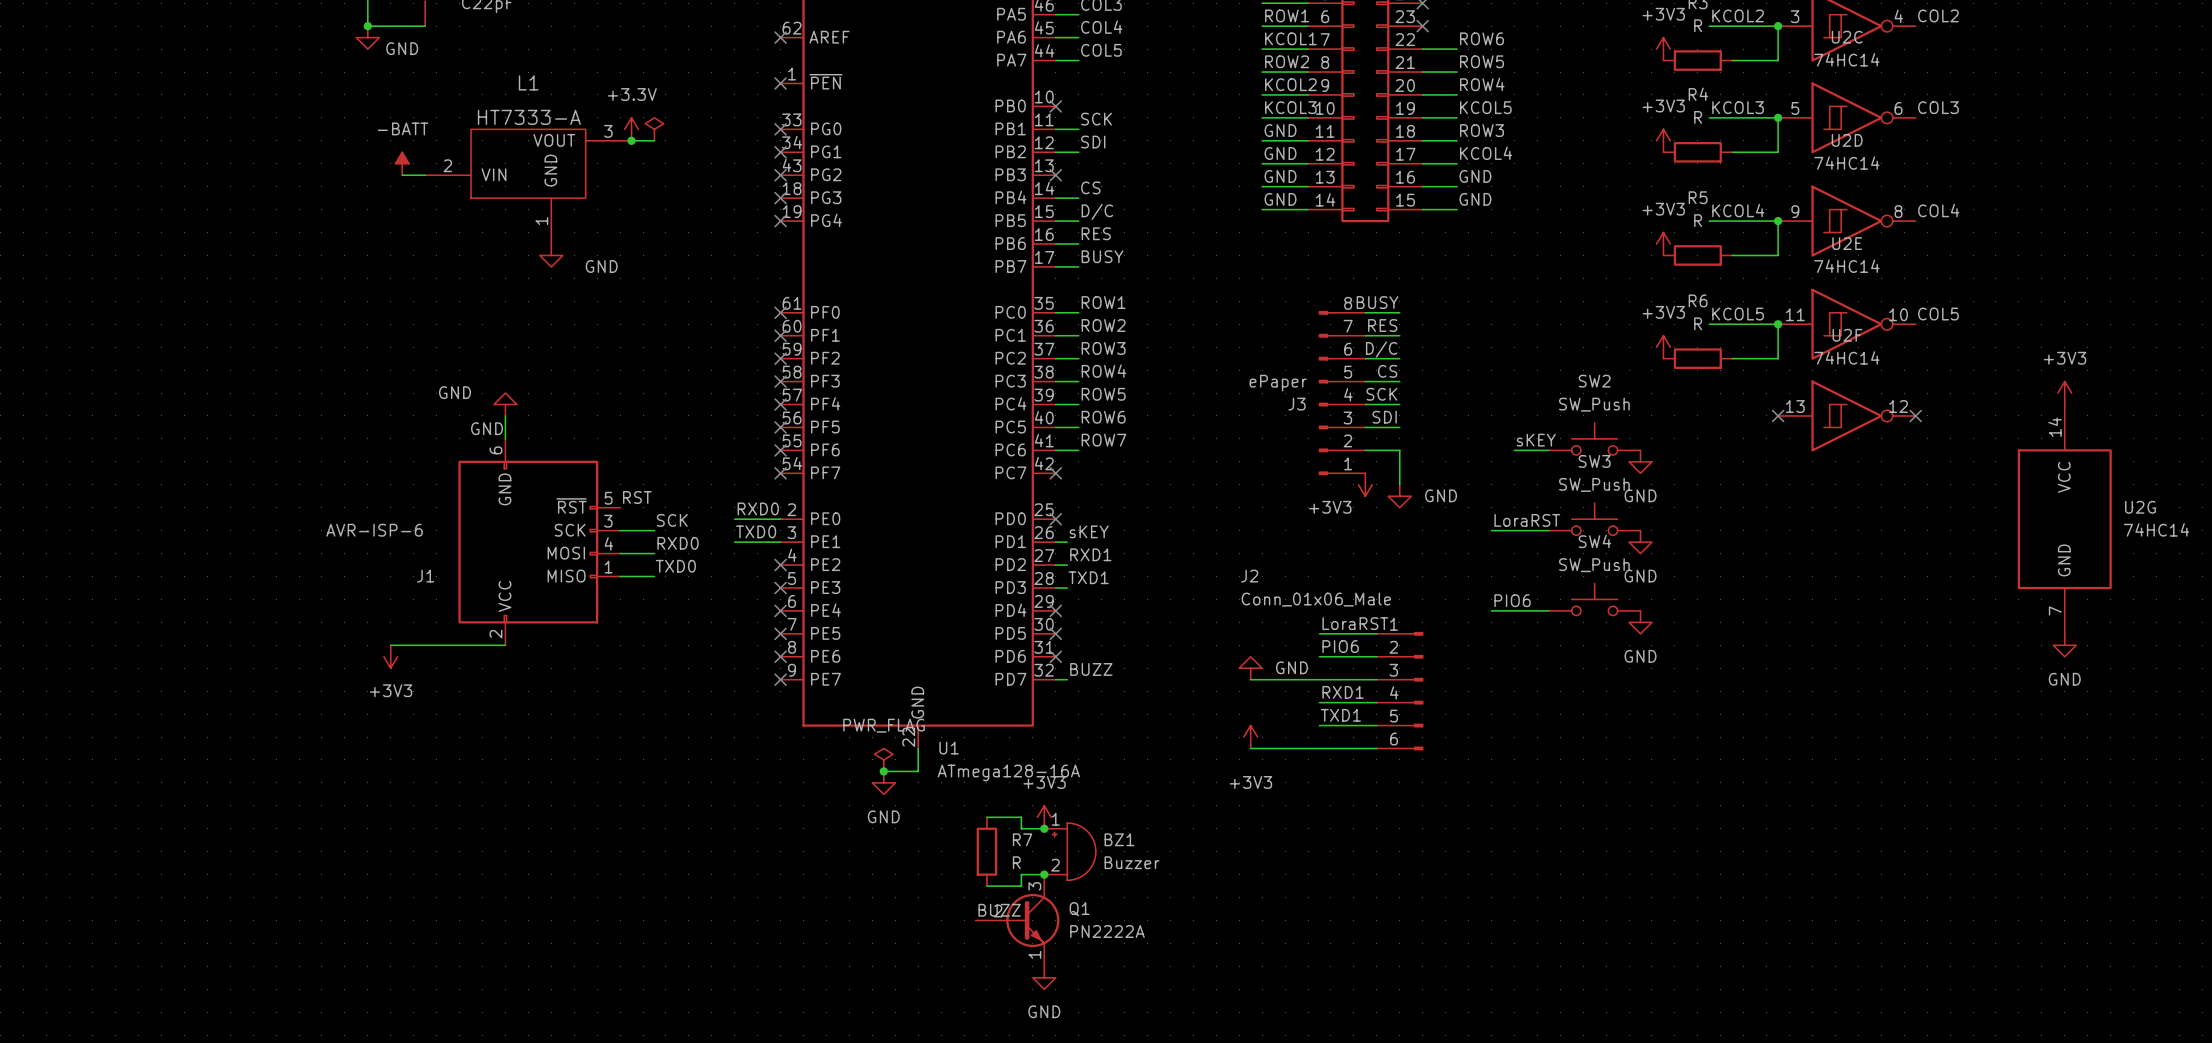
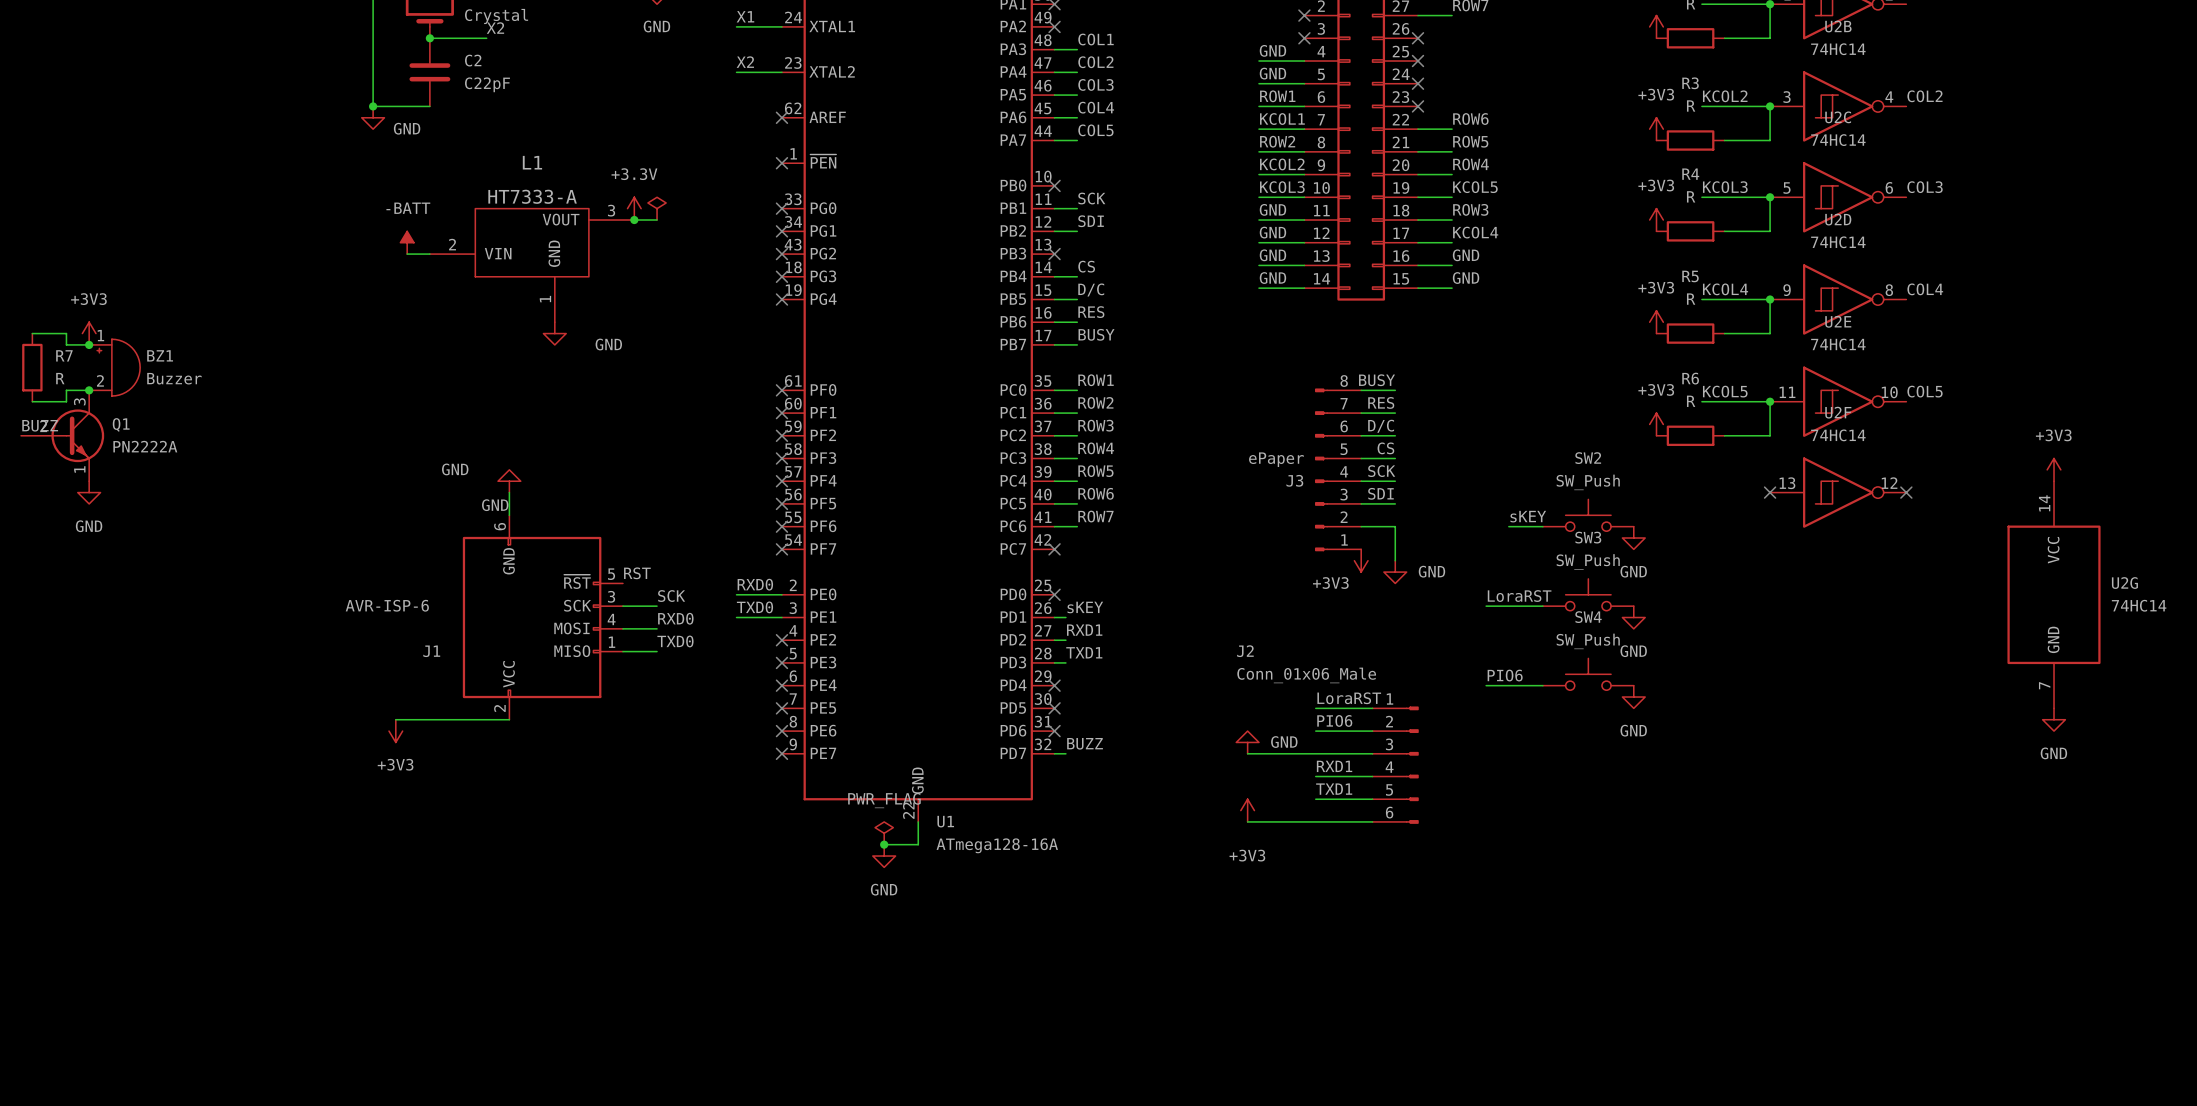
wire: none -> (32, 333) (66, 333) (66, 344) (89, 344)
power symbol: none -> +3V3 (89, 333)
junction: none -> (89, 344)
wire: none -> (89, 390) (66, 390) (66, 401) (32, 401)
junction: none -> (89, 390)
label: none -> BUZZ (40, 425)
power symbol: none -> GND (89, 492)
wire: (986, 817) (1021, 817) (1021, 828) (1044, 828) -> none
power symbol: +3V3 (1044, 817) -> none
junction: (1044, 828) -> none
R7 position: (986, 851) -> (32, 367)
BZ1 position: (1070, 851) -> (114, 367)
wire: (1044, 874) (1021, 874) (1021, 886) (986, 886) -> none
junction: (1044, 874) -> none
label: BUZZ (999, 910) -> none
Q1 position: (1017, 920) -> (62, 435)
power symbol: GND (1044, 977) -> none

